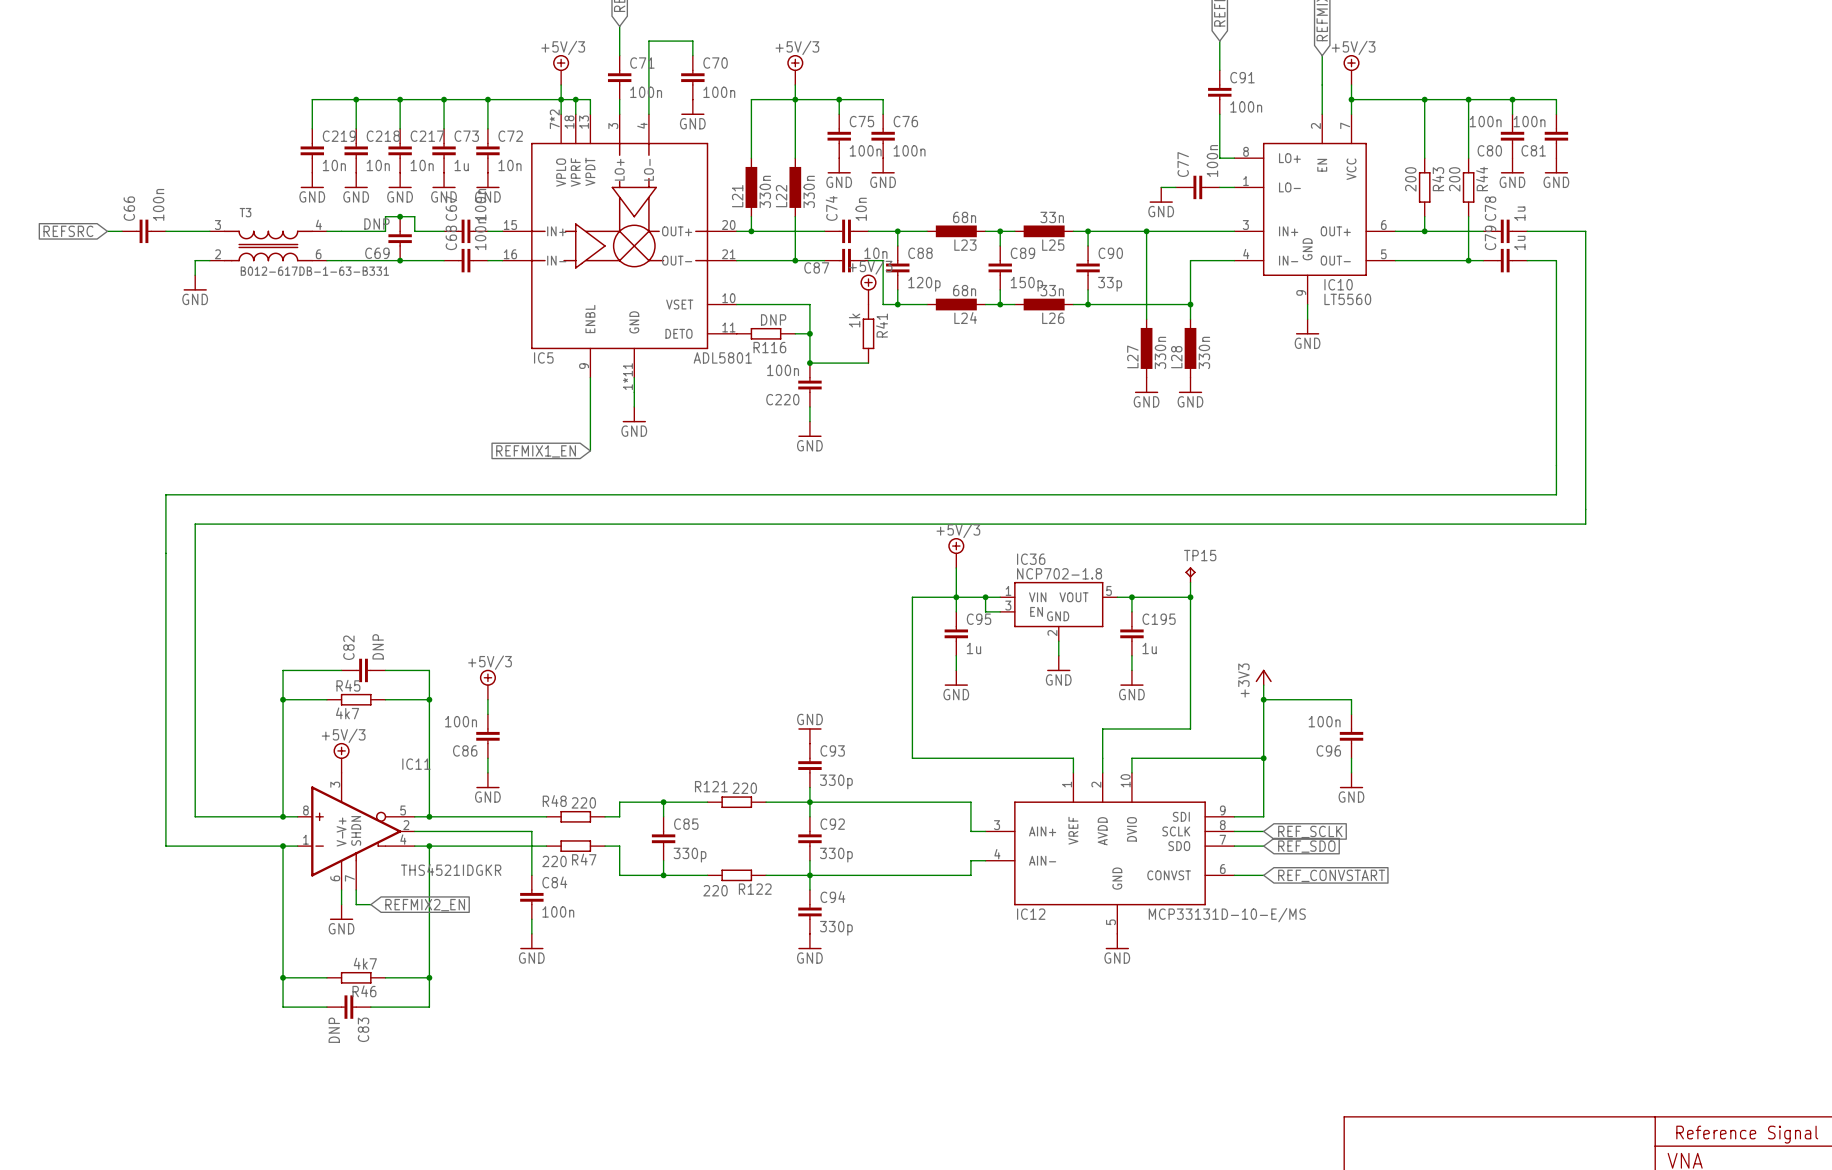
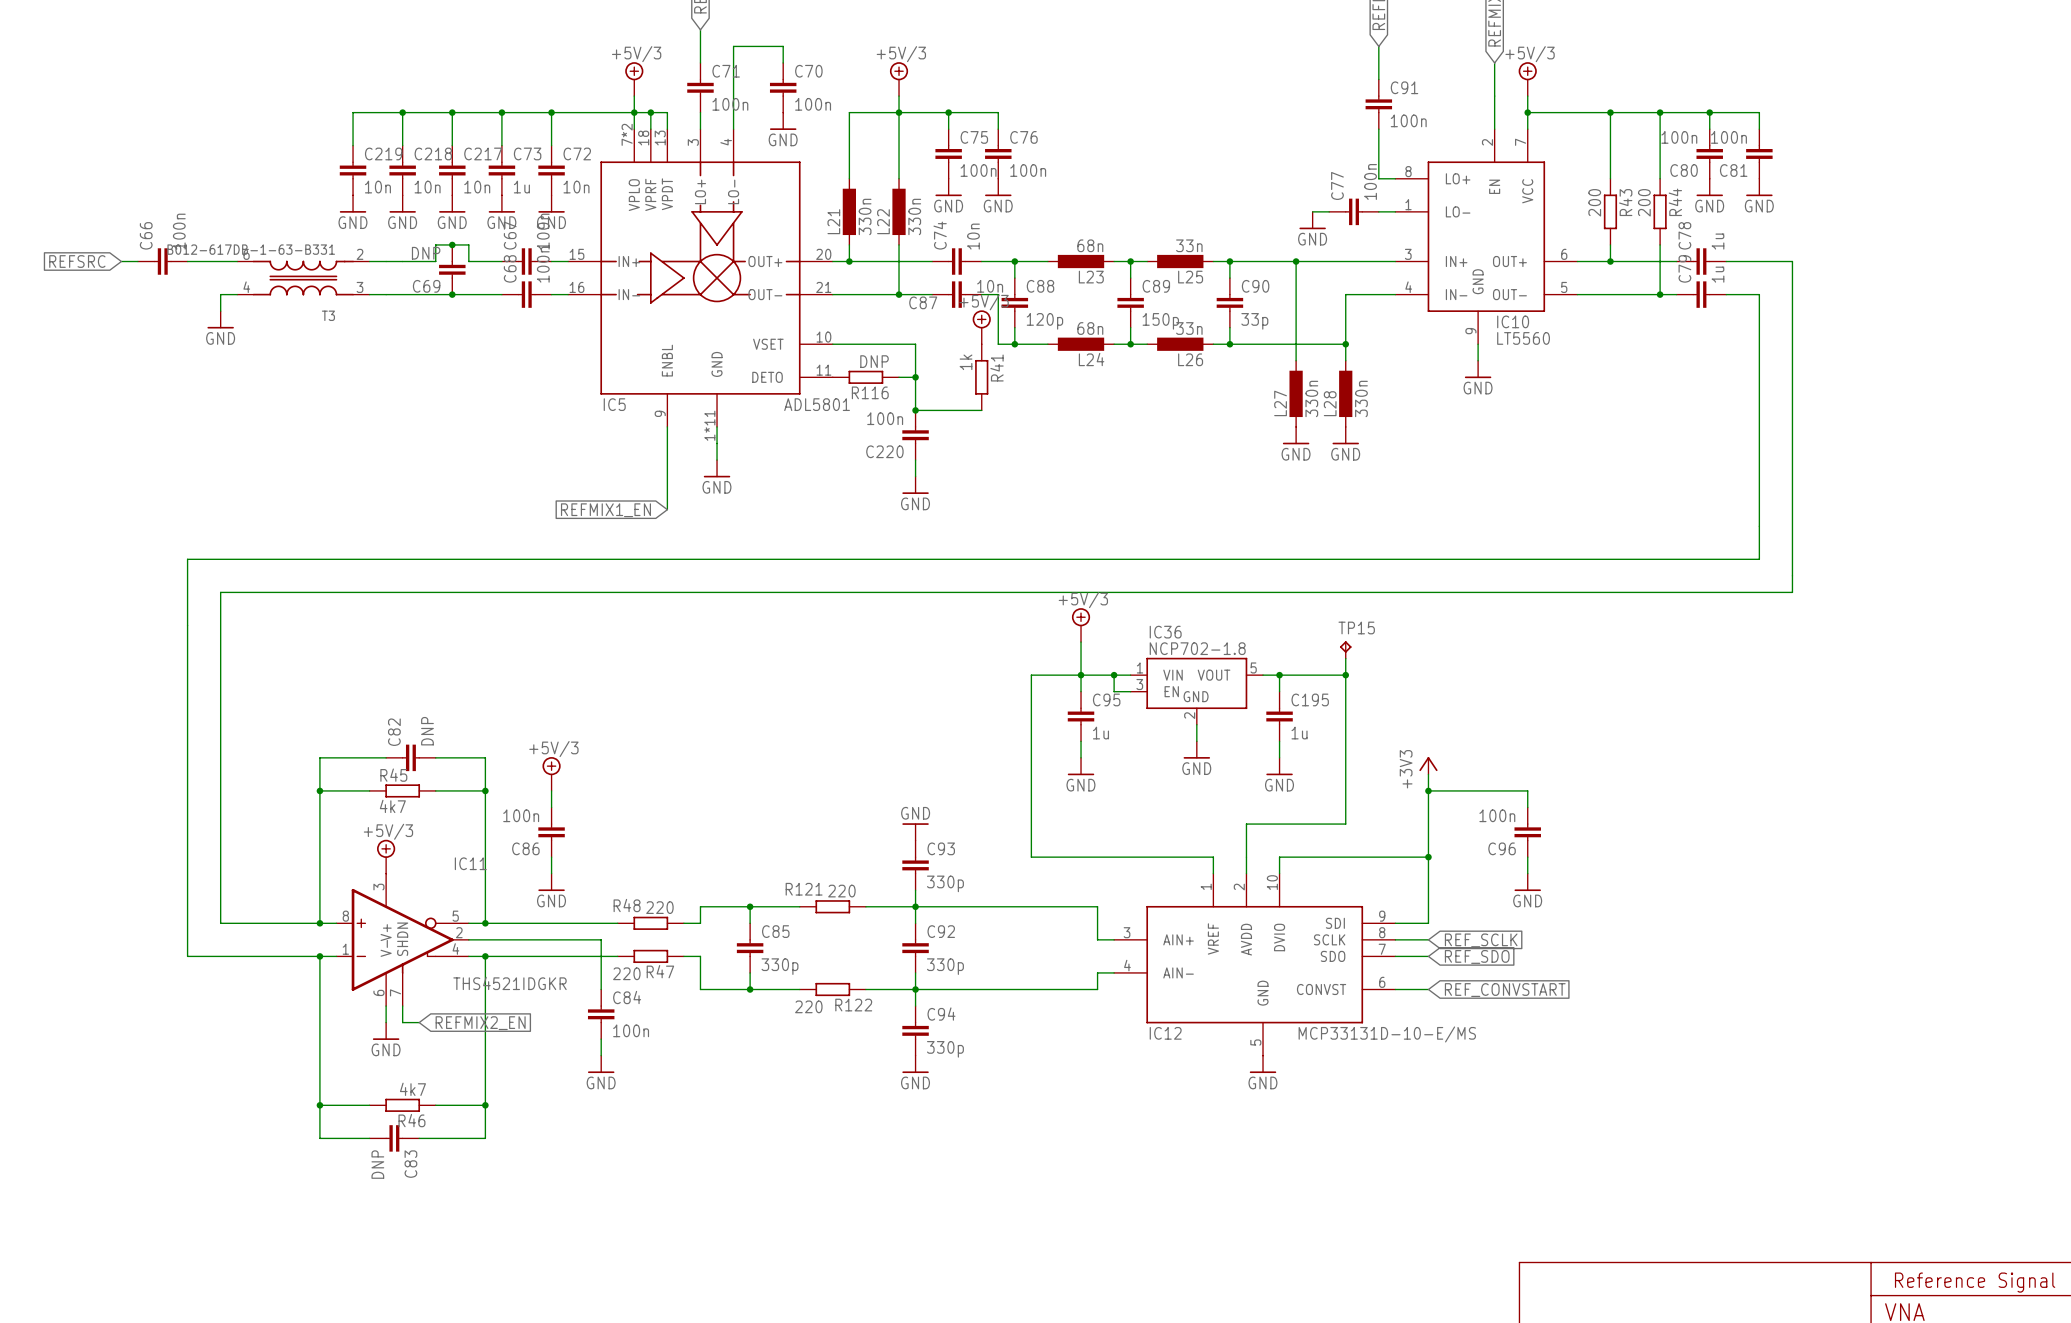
T3 rotation: 0° (268, 245) -> 180° (303, 278)

